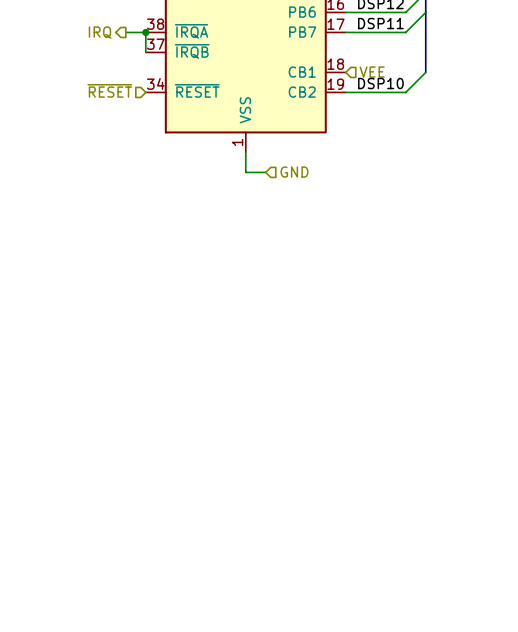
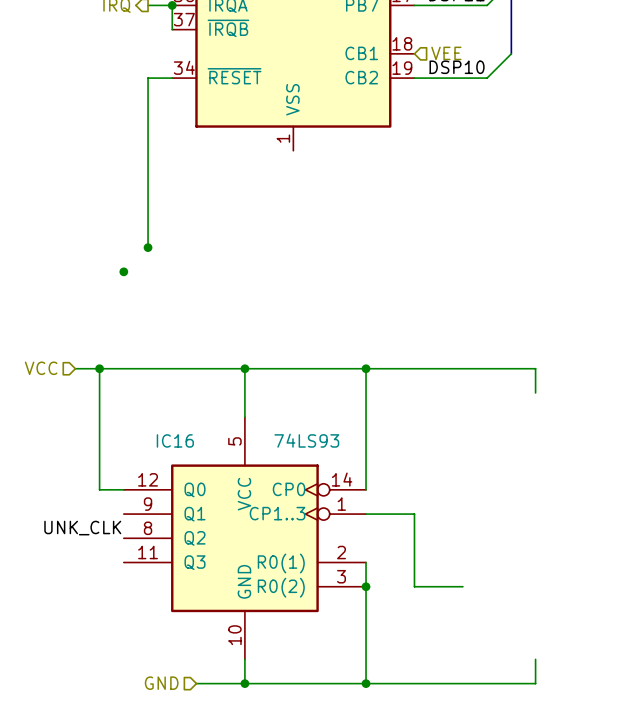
hierarchical label: ~{RESET} (109, 90) -> none
wire: none -> (172, 78) (148, 78) (148, 247)
wire: (245, 152) (245, 172) (265, 172) -> none
hierarchical label: GND (294, 172) -> none
junction: none -> (148, 247)
junction: none -> (123, 271)
hierarchical label: none -> VCC (41, 368)
wire: none -> (75, 368) (535, 368) (535, 392)
wire: none -> (99, 368) (99, 489) (123, 489)
junction: none -> (99, 368)
wire: none -> (244, 368) (244, 417)
junction: none -> (244, 368)
wire: none -> (366, 368) (366, 489)
junction: none -> (366, 368)
wire: none -> (366, 514) (414, 514) (414, 586) (462, 586)
label: none -> UNK_CLK (82, 528)
IC16: none -> 74LS93 (244, 538)
wire: none -> (366, 562) (366, 683)
junction: none -> (366, 586)
wire: none -> (244, 659) (244, 683)
wire: none -> (535, 659) (535, 683) (196, 683)
hierarchical label: none -> GND (161, 683)
junction: none -> (244, 683)
junction: none -> (366, 683)

